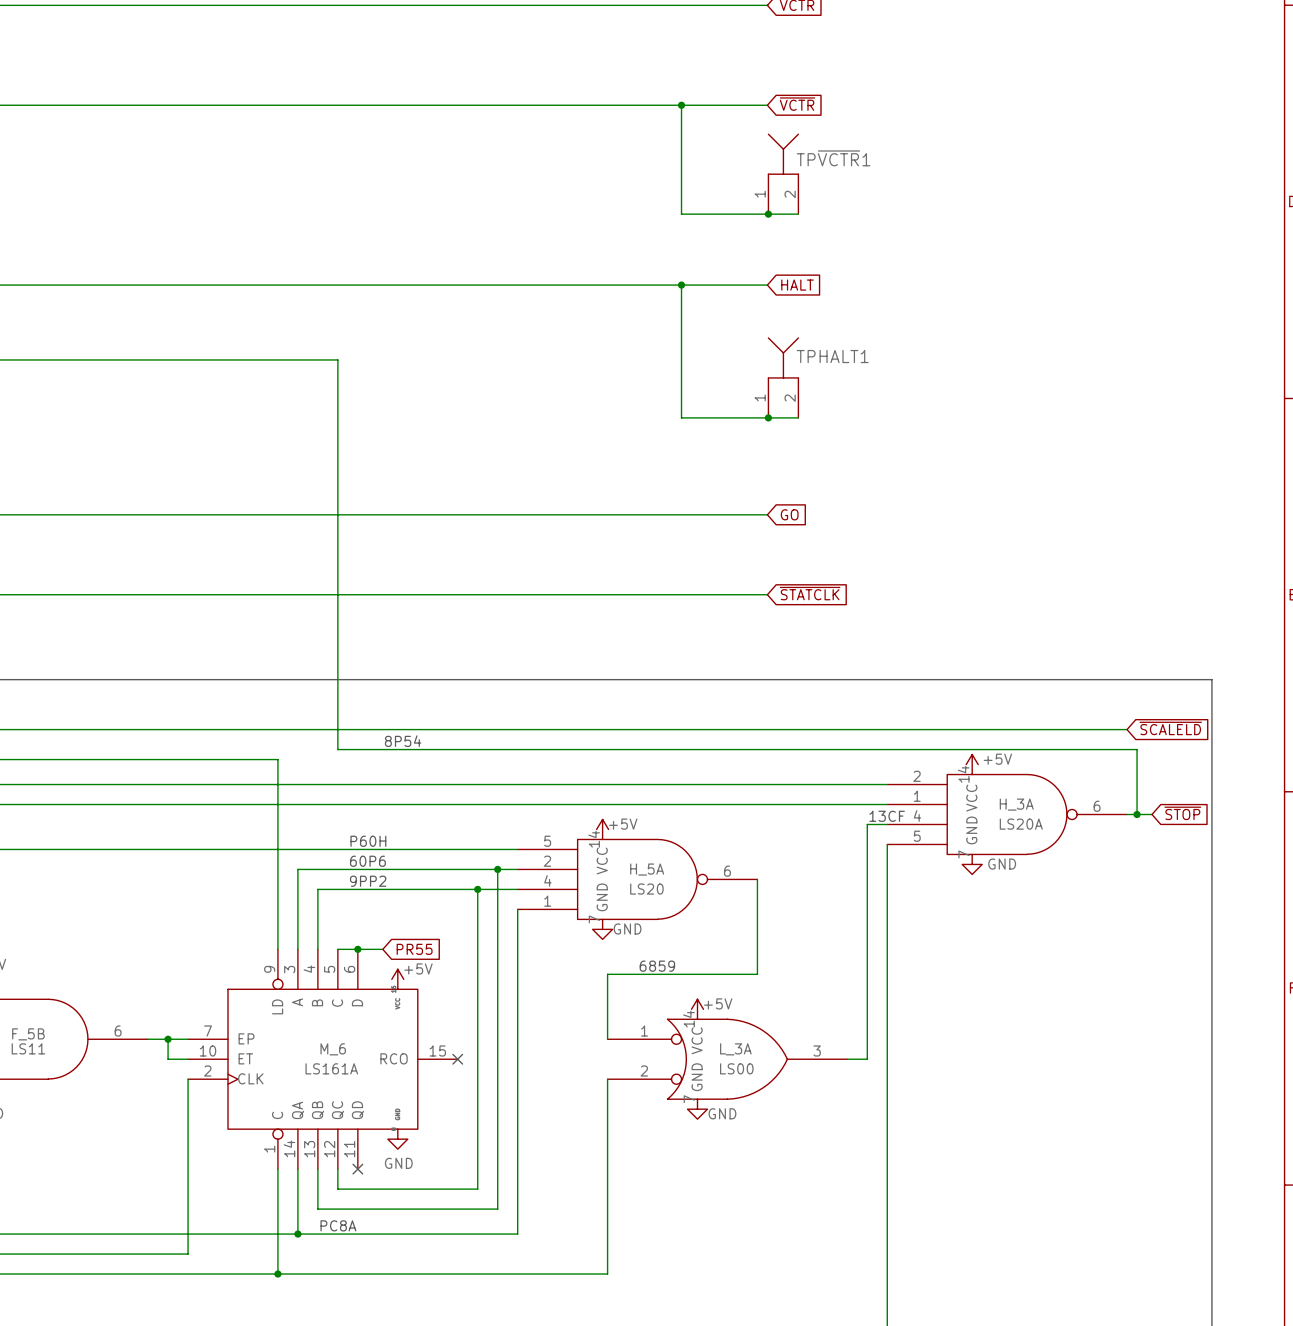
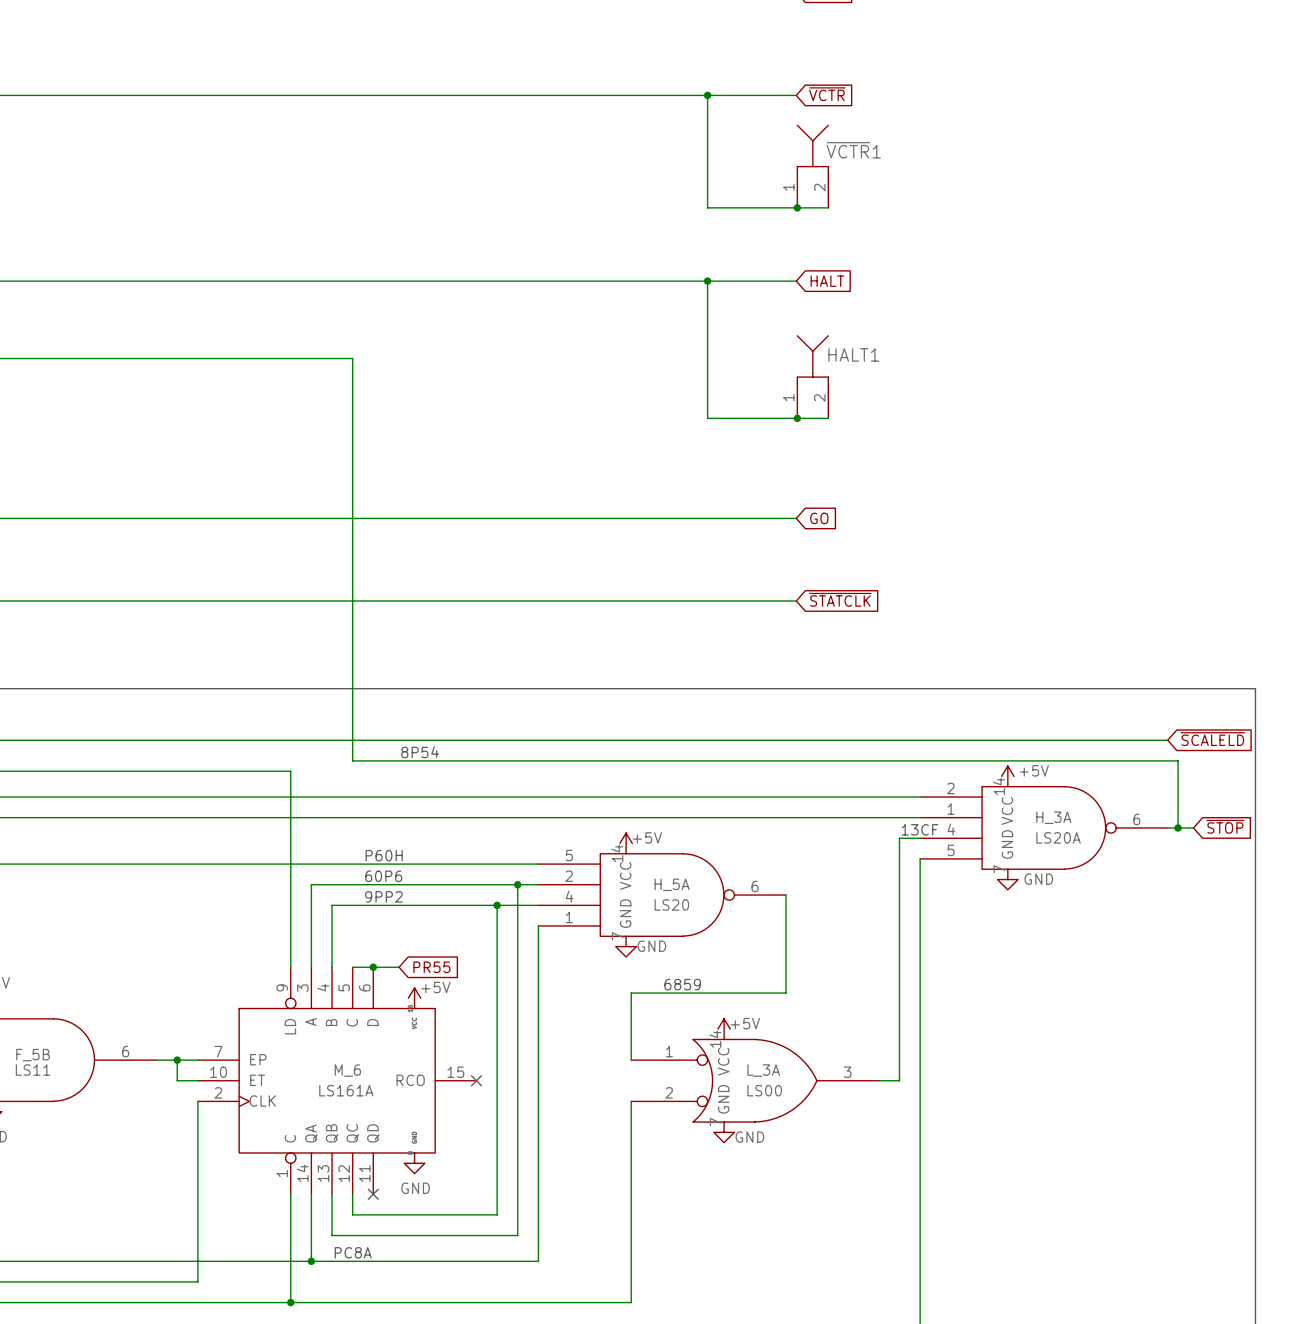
TP~{VCTR}1 name: TP~{VCTR}1 (833, 158) -> ~{VCTR}1 (853, 150)
TPHALT1 name: TPHALT1 (832, 356) -> HALT1 (853, 354)

